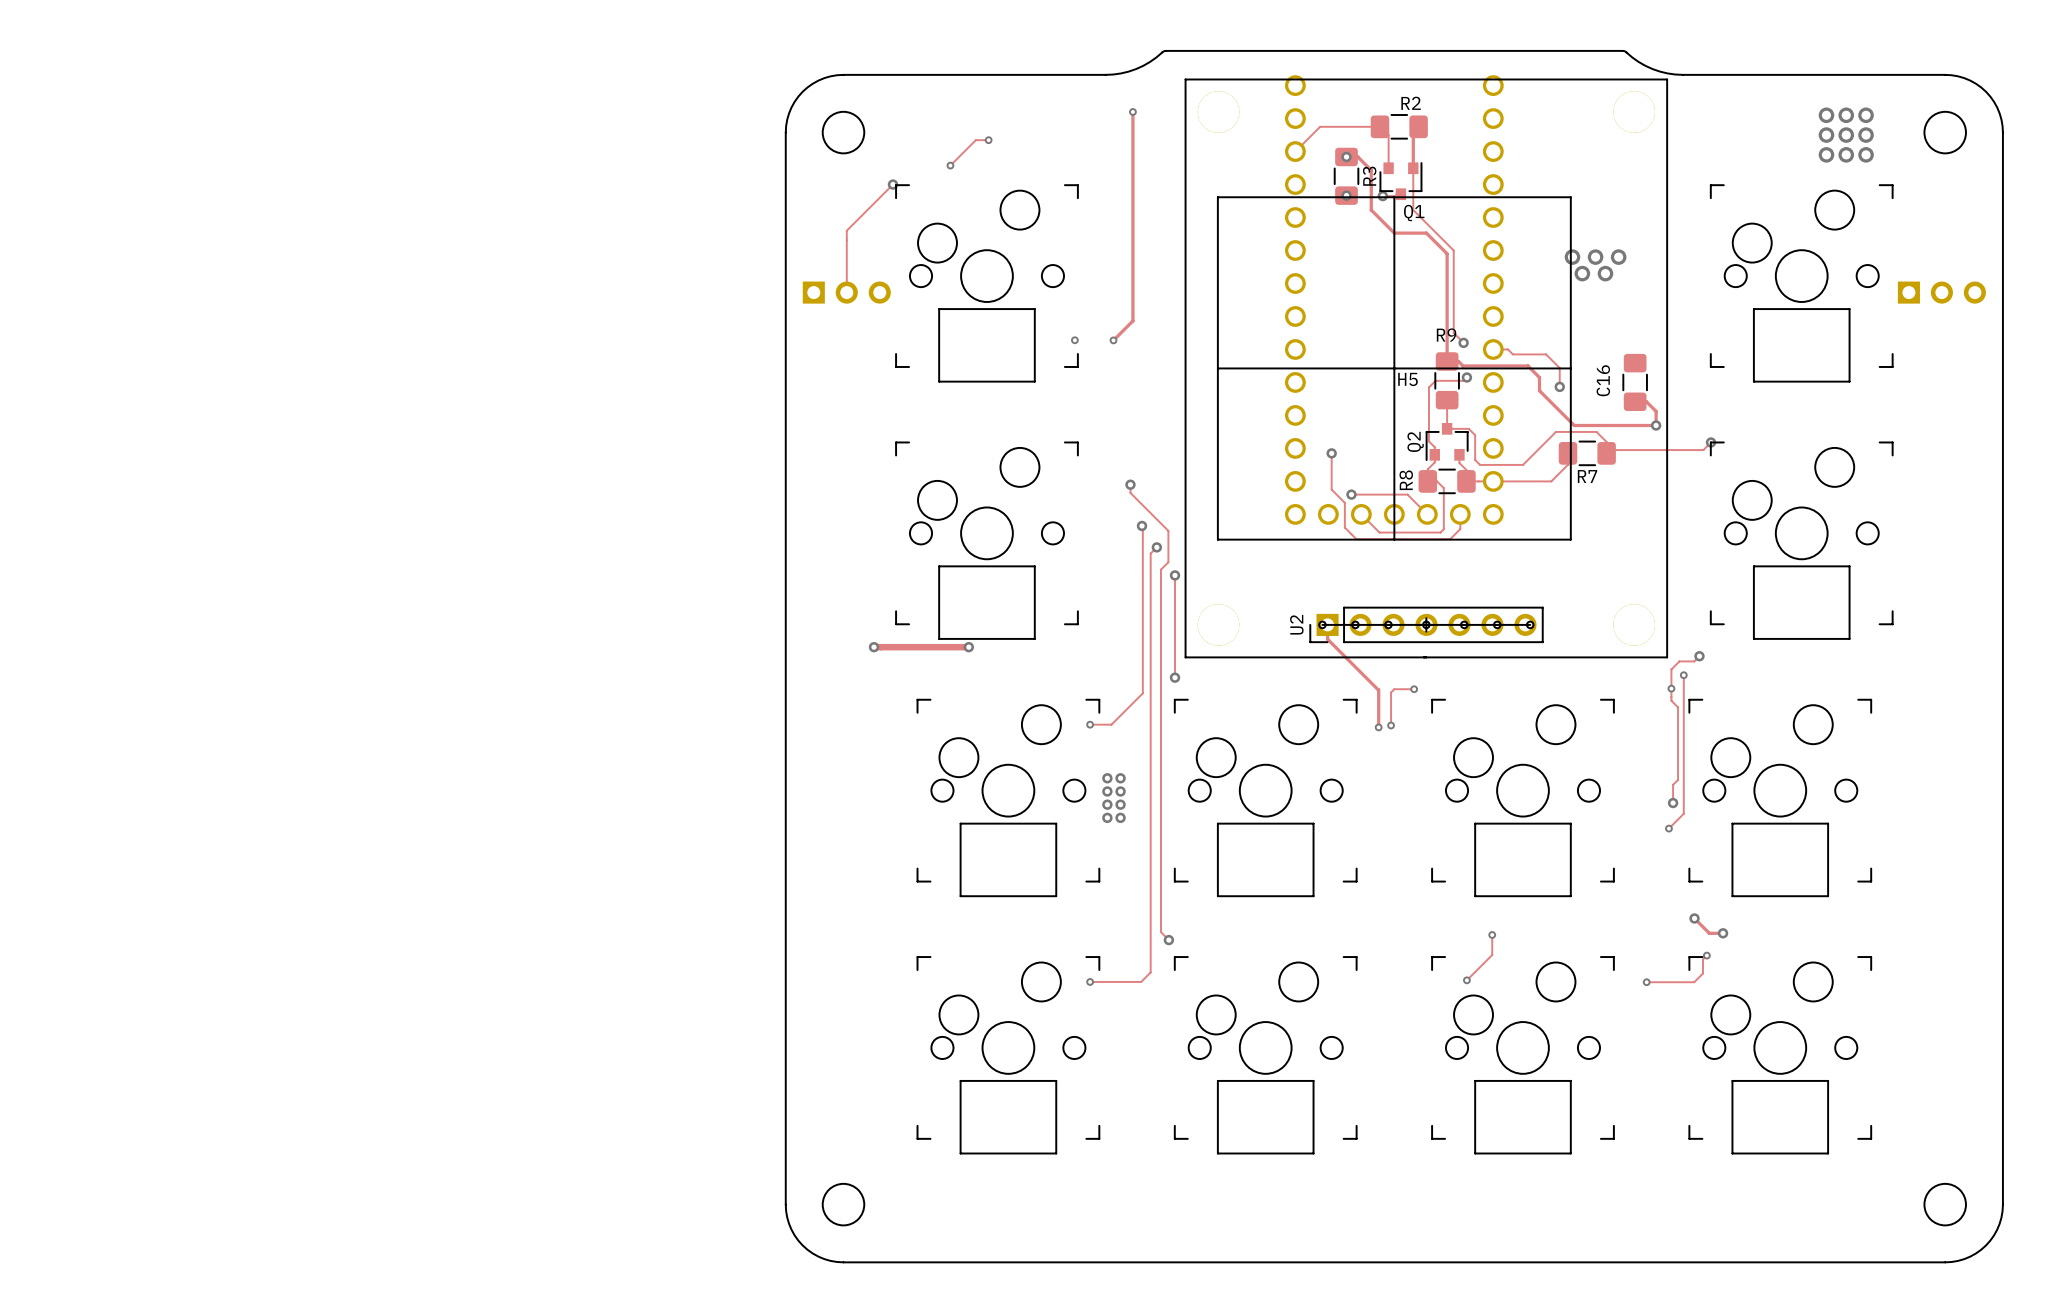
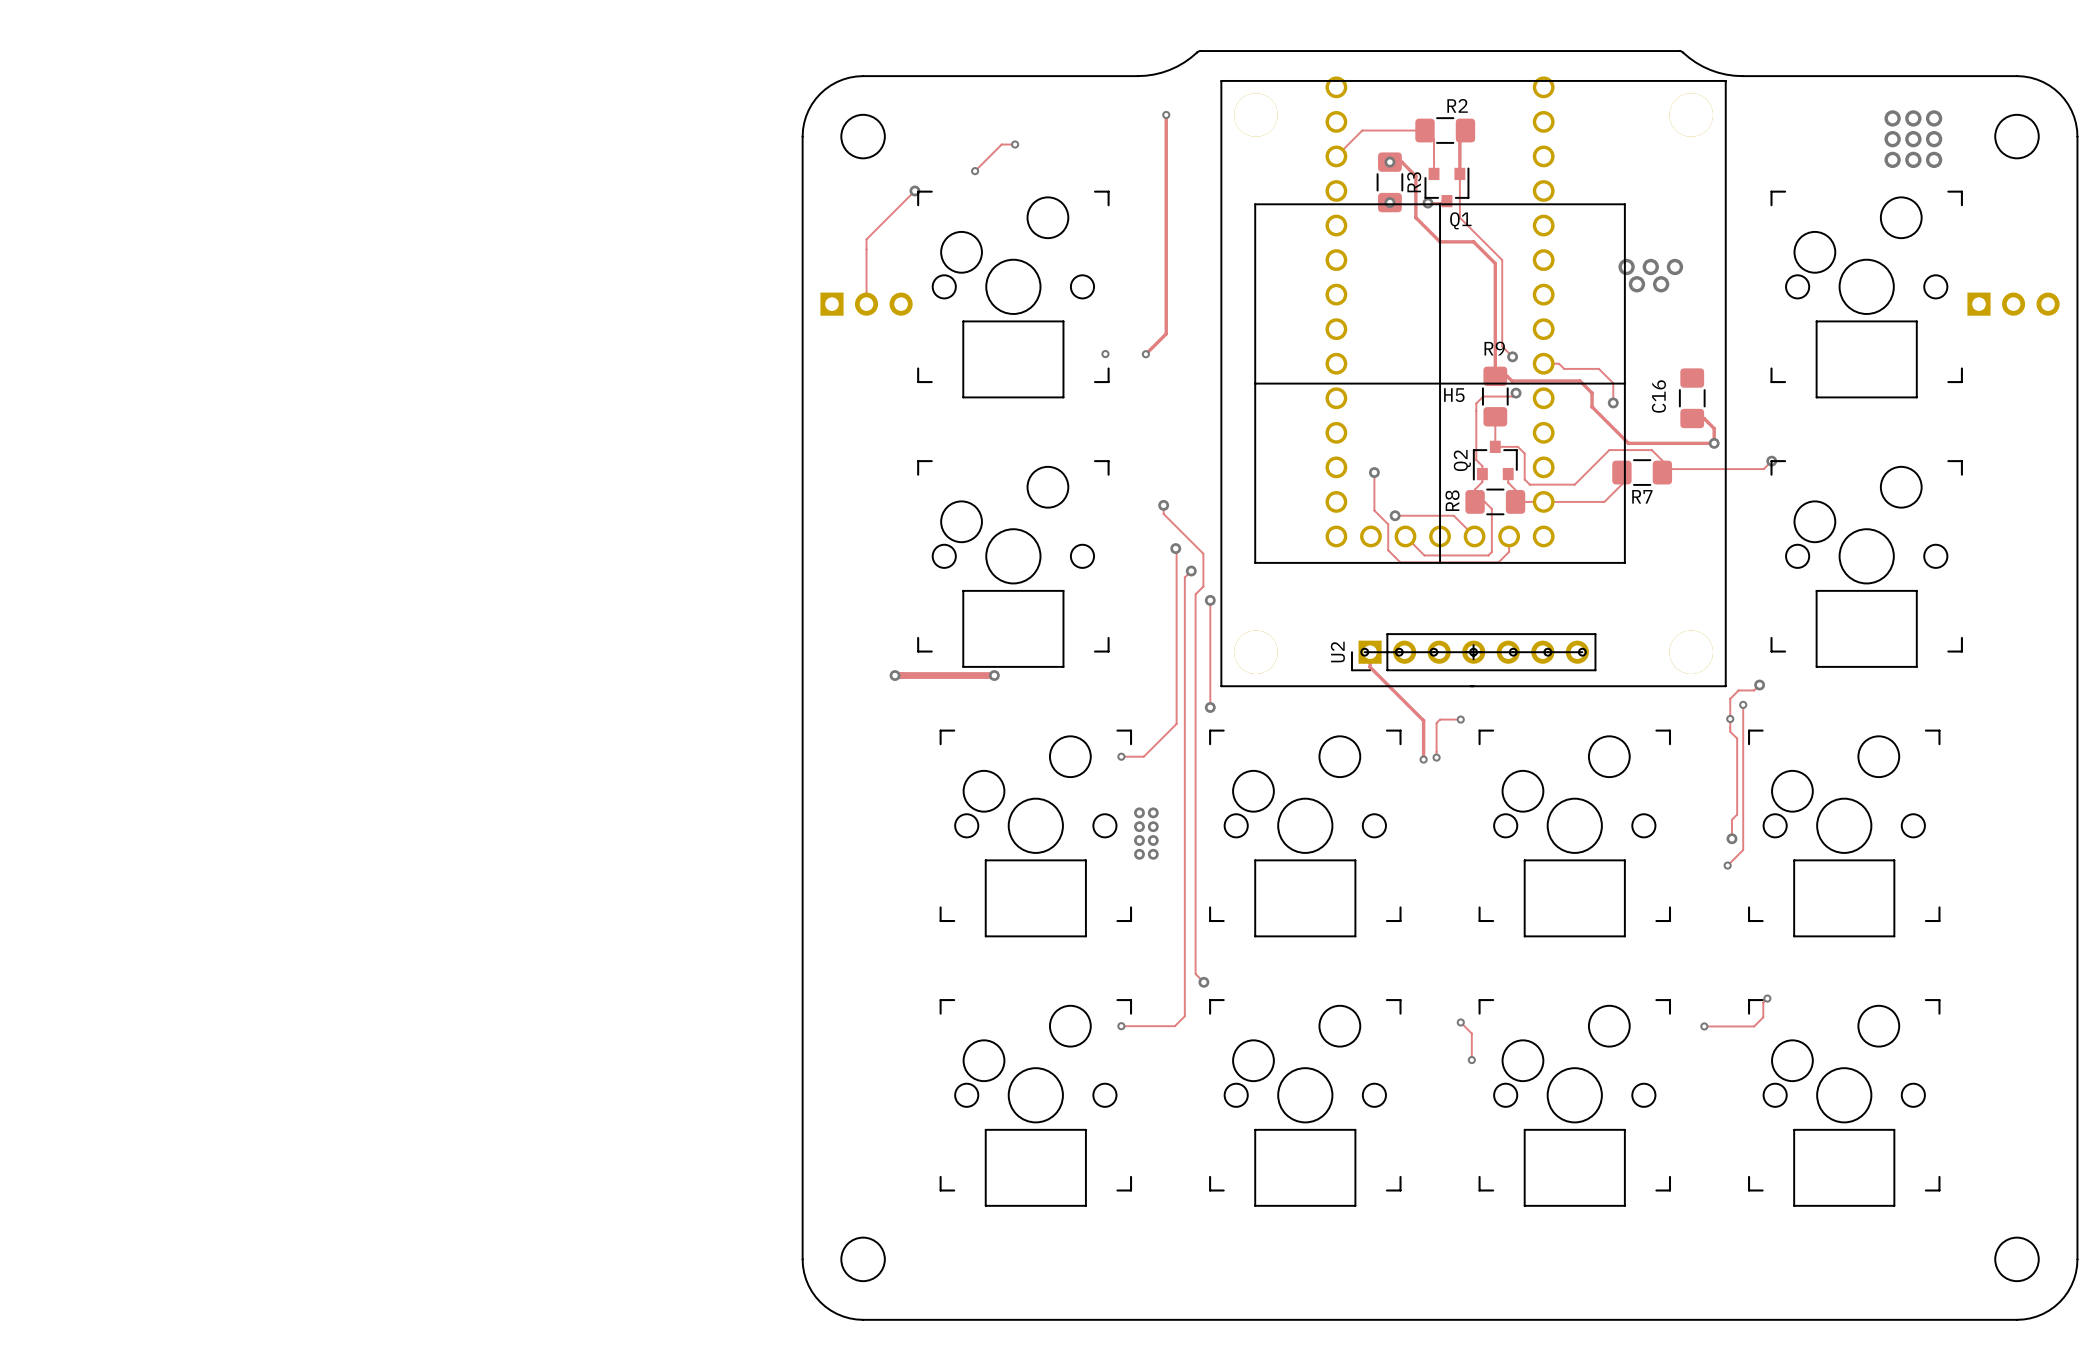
track: (1694, 918) (1709, 933) (1723, 933) -> none
via: (1694, 918) -> none
via: (1723, 933) -> none
track: (1492, 934) (1492, 955) (1466, 980) -> none
via: (1492, 934) -> none
track: none -> (1460, 1022) (1471, 1033) (1471, 1060)
via: none -> (1460, 1022)
via: (1466, 980) -> none
via: none -> (1471, 1060)

